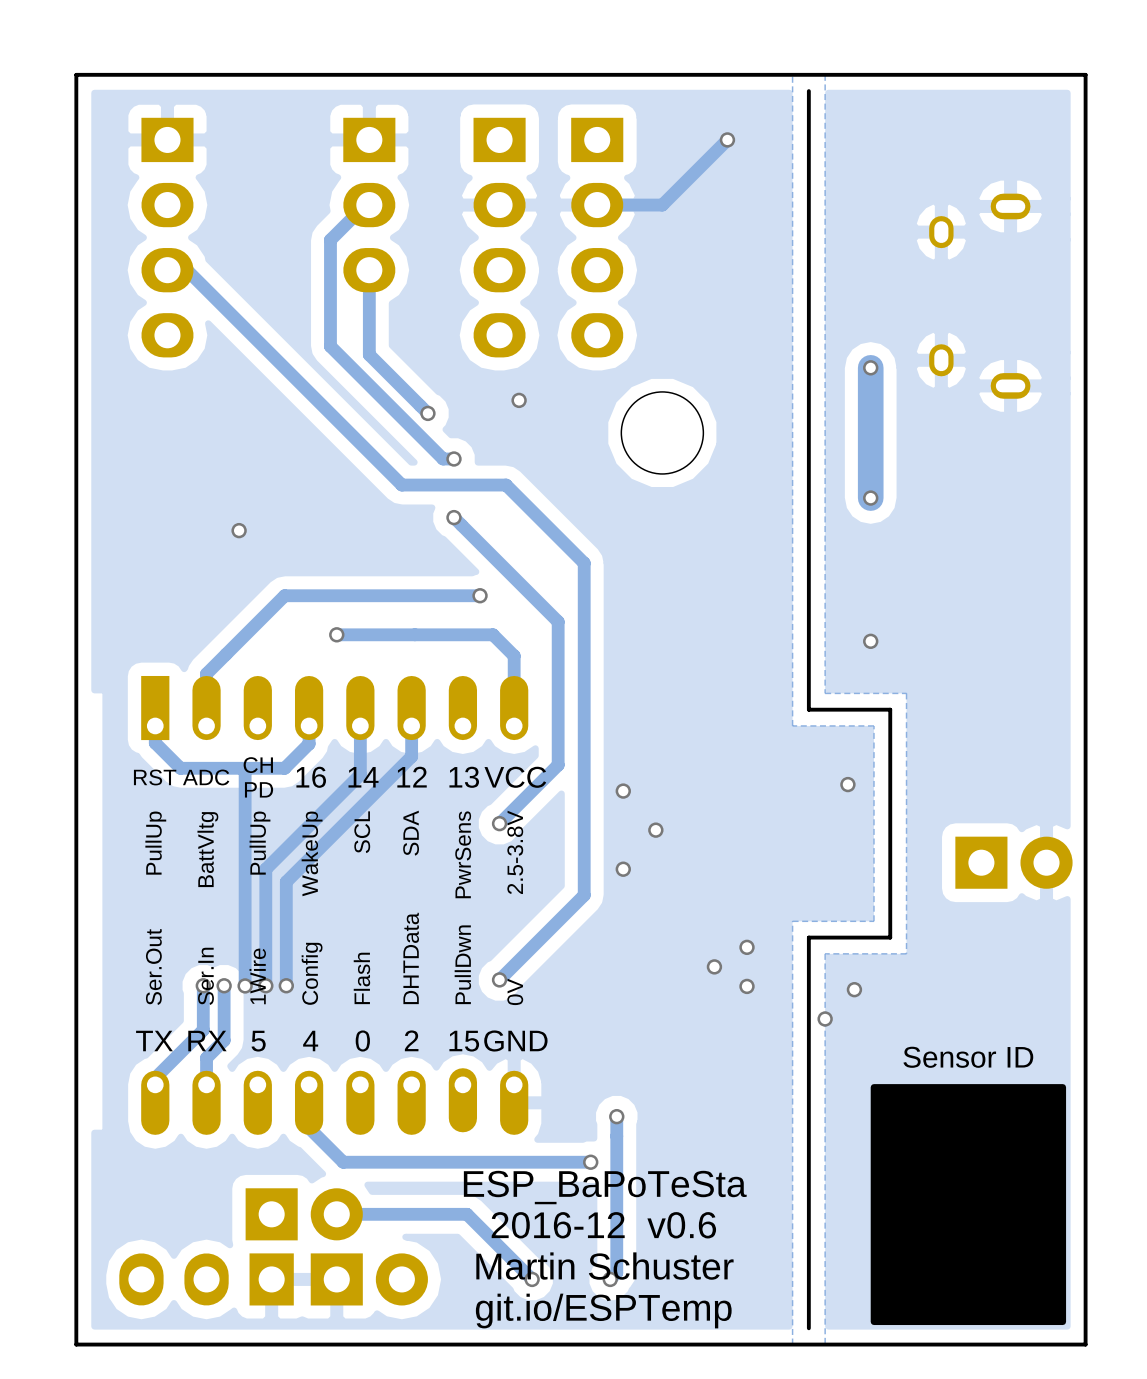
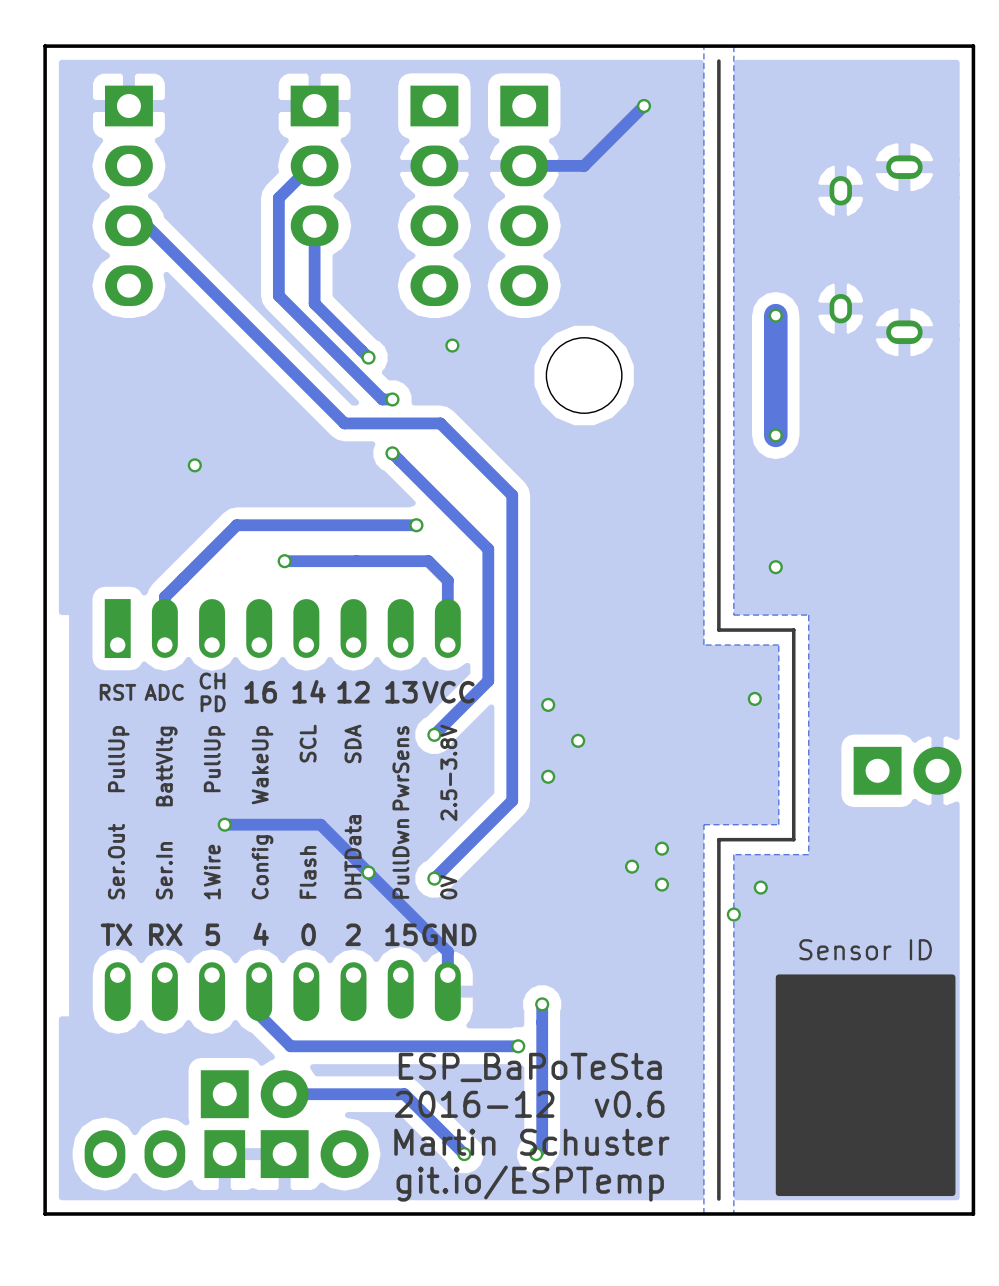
track: (309, 725) (309, 743) (284, 768) (180, 768) (155, 743) (155, 725) -> none
track: (360, 725) (360, 774) (265, 869) (265, 985) -> none
track: (411, 725) (411, 756) (286, 881) (286, 985) -> none
track: (245, 768) (245, 985) -> none
track: none -> (224, 824) (320, 824) (447, 951) (447, 975)
via: none -> (224, 824)
via: none -> (368, 872)
track: (203, 985) (203, 1030) (155, 1078) (155, 1084) -> none
via: (203, 985) -> none
track: (224, 985) (224, 1040) (206, 1058) (206, 1084) -> none
via: (224, 985) -> none
via: (245, 985) -> none
via: (265, 985) -> none
via: (286, 985) -> none

